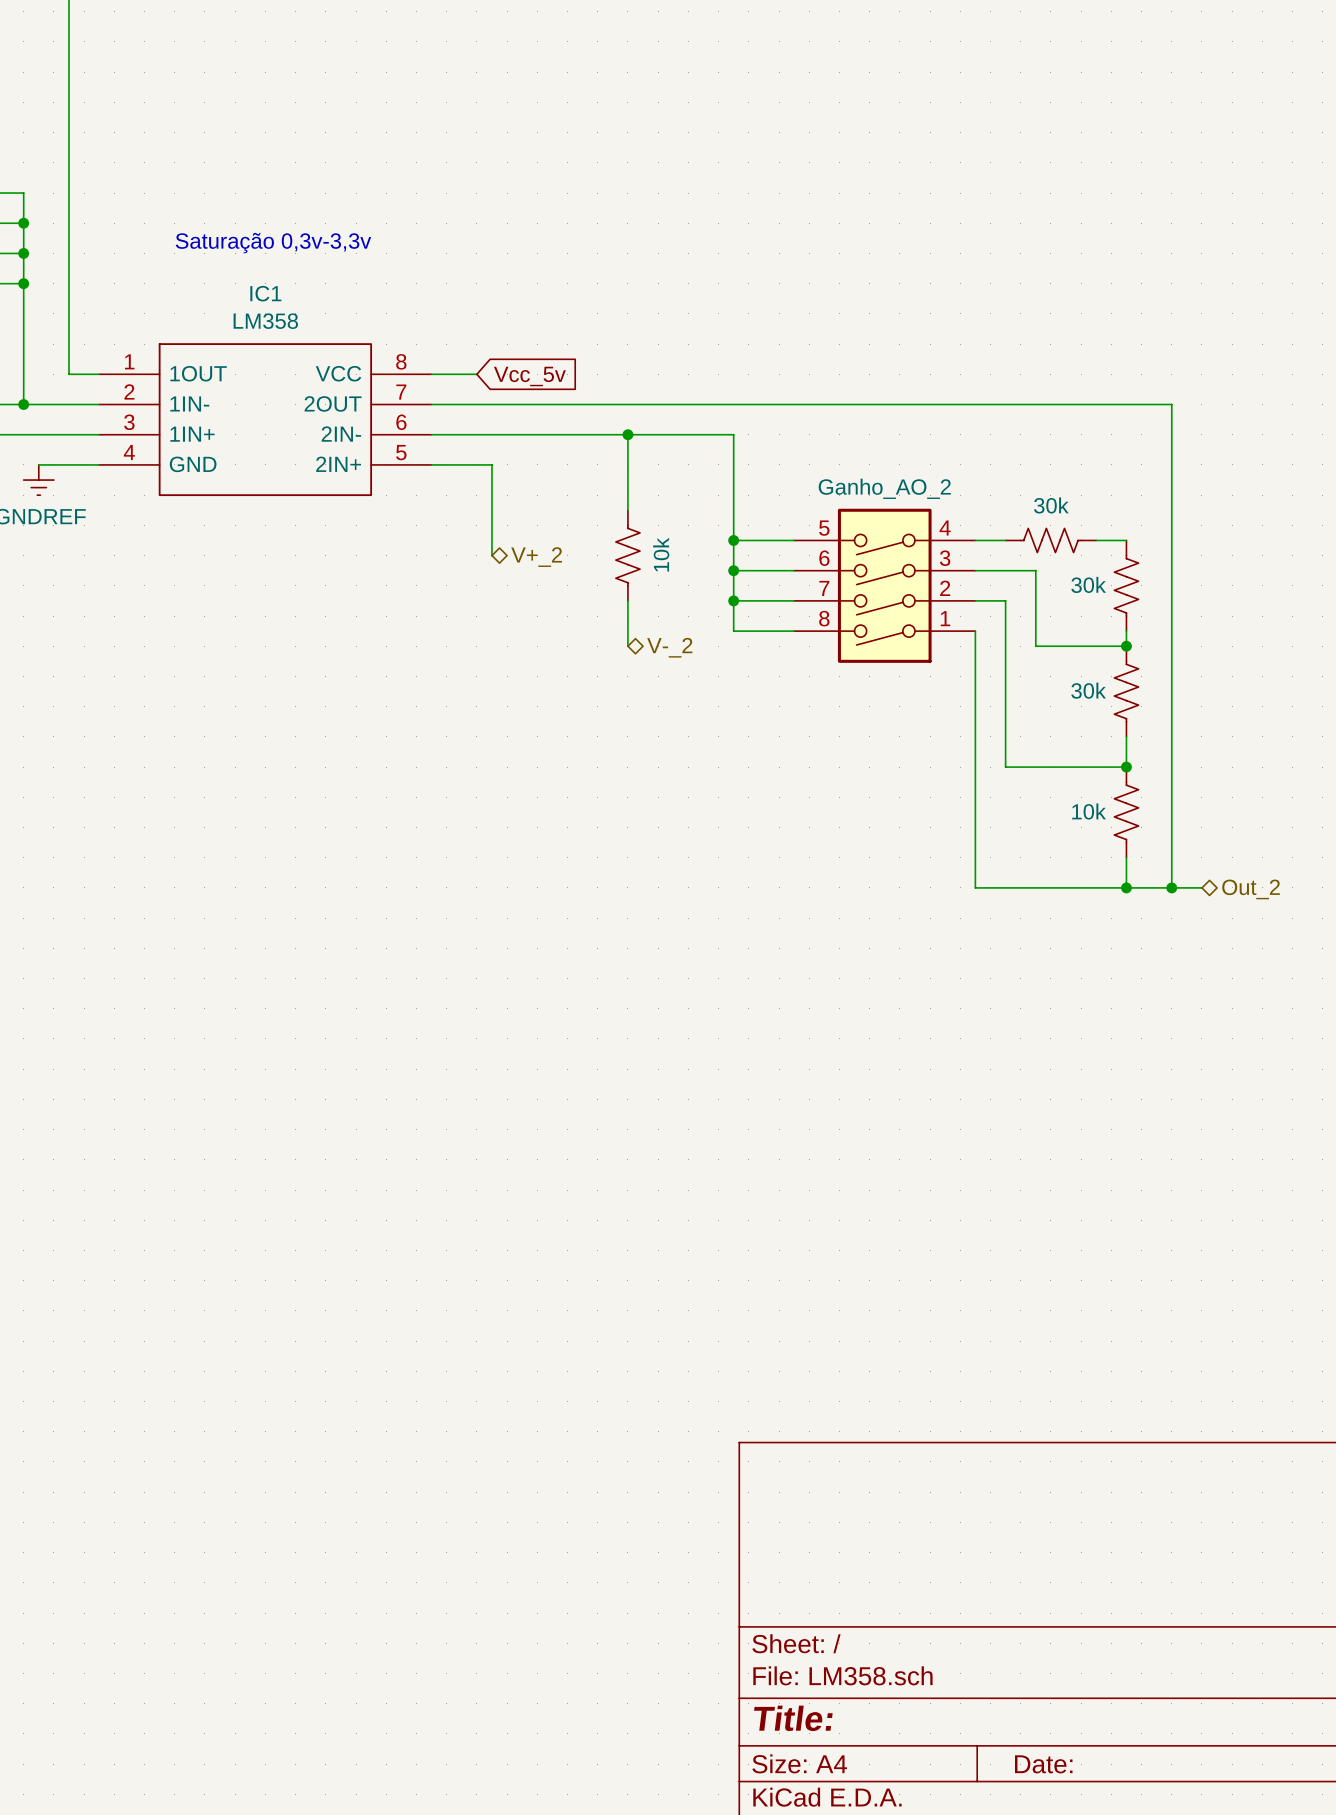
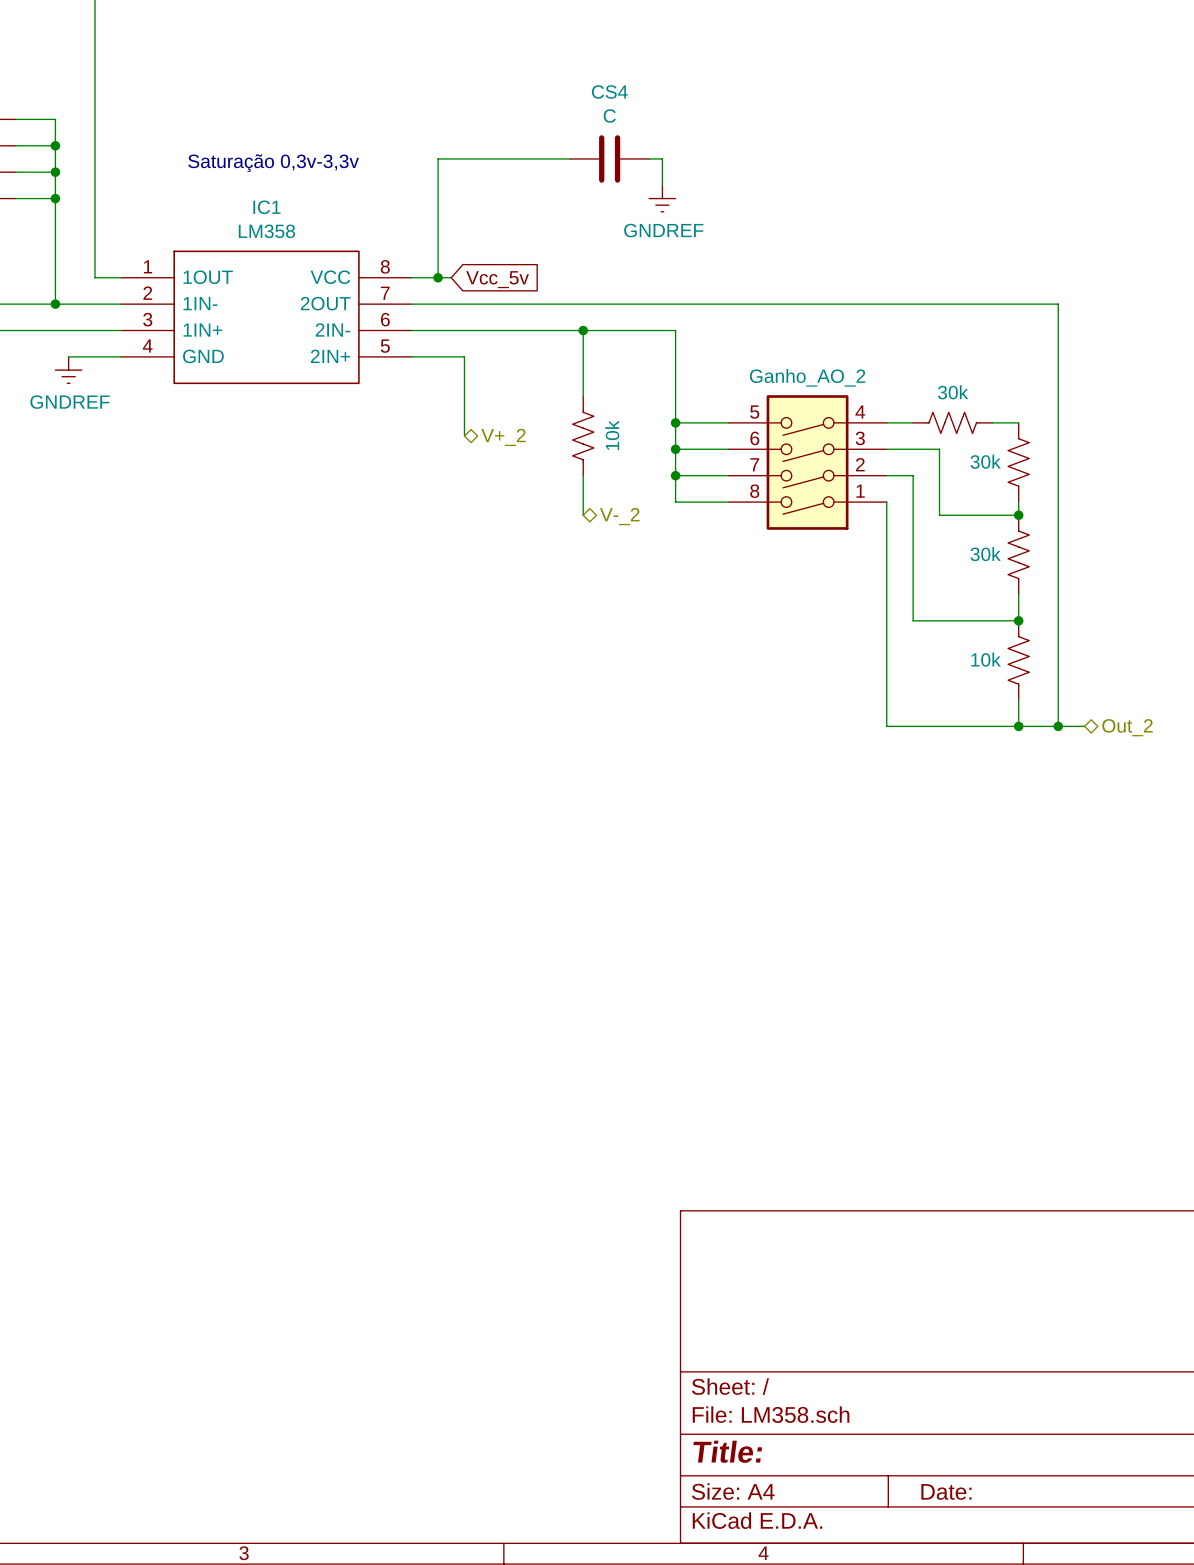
wire: none -> (570, 158) (438, 158) (438, 277)
CS4: none -> C (609, 158)
wire: none -> (649, 158) (662, 158) (662, 185)
power symbol: none -> GNDREF (662, 198)
junction: none -> (438, 277)

